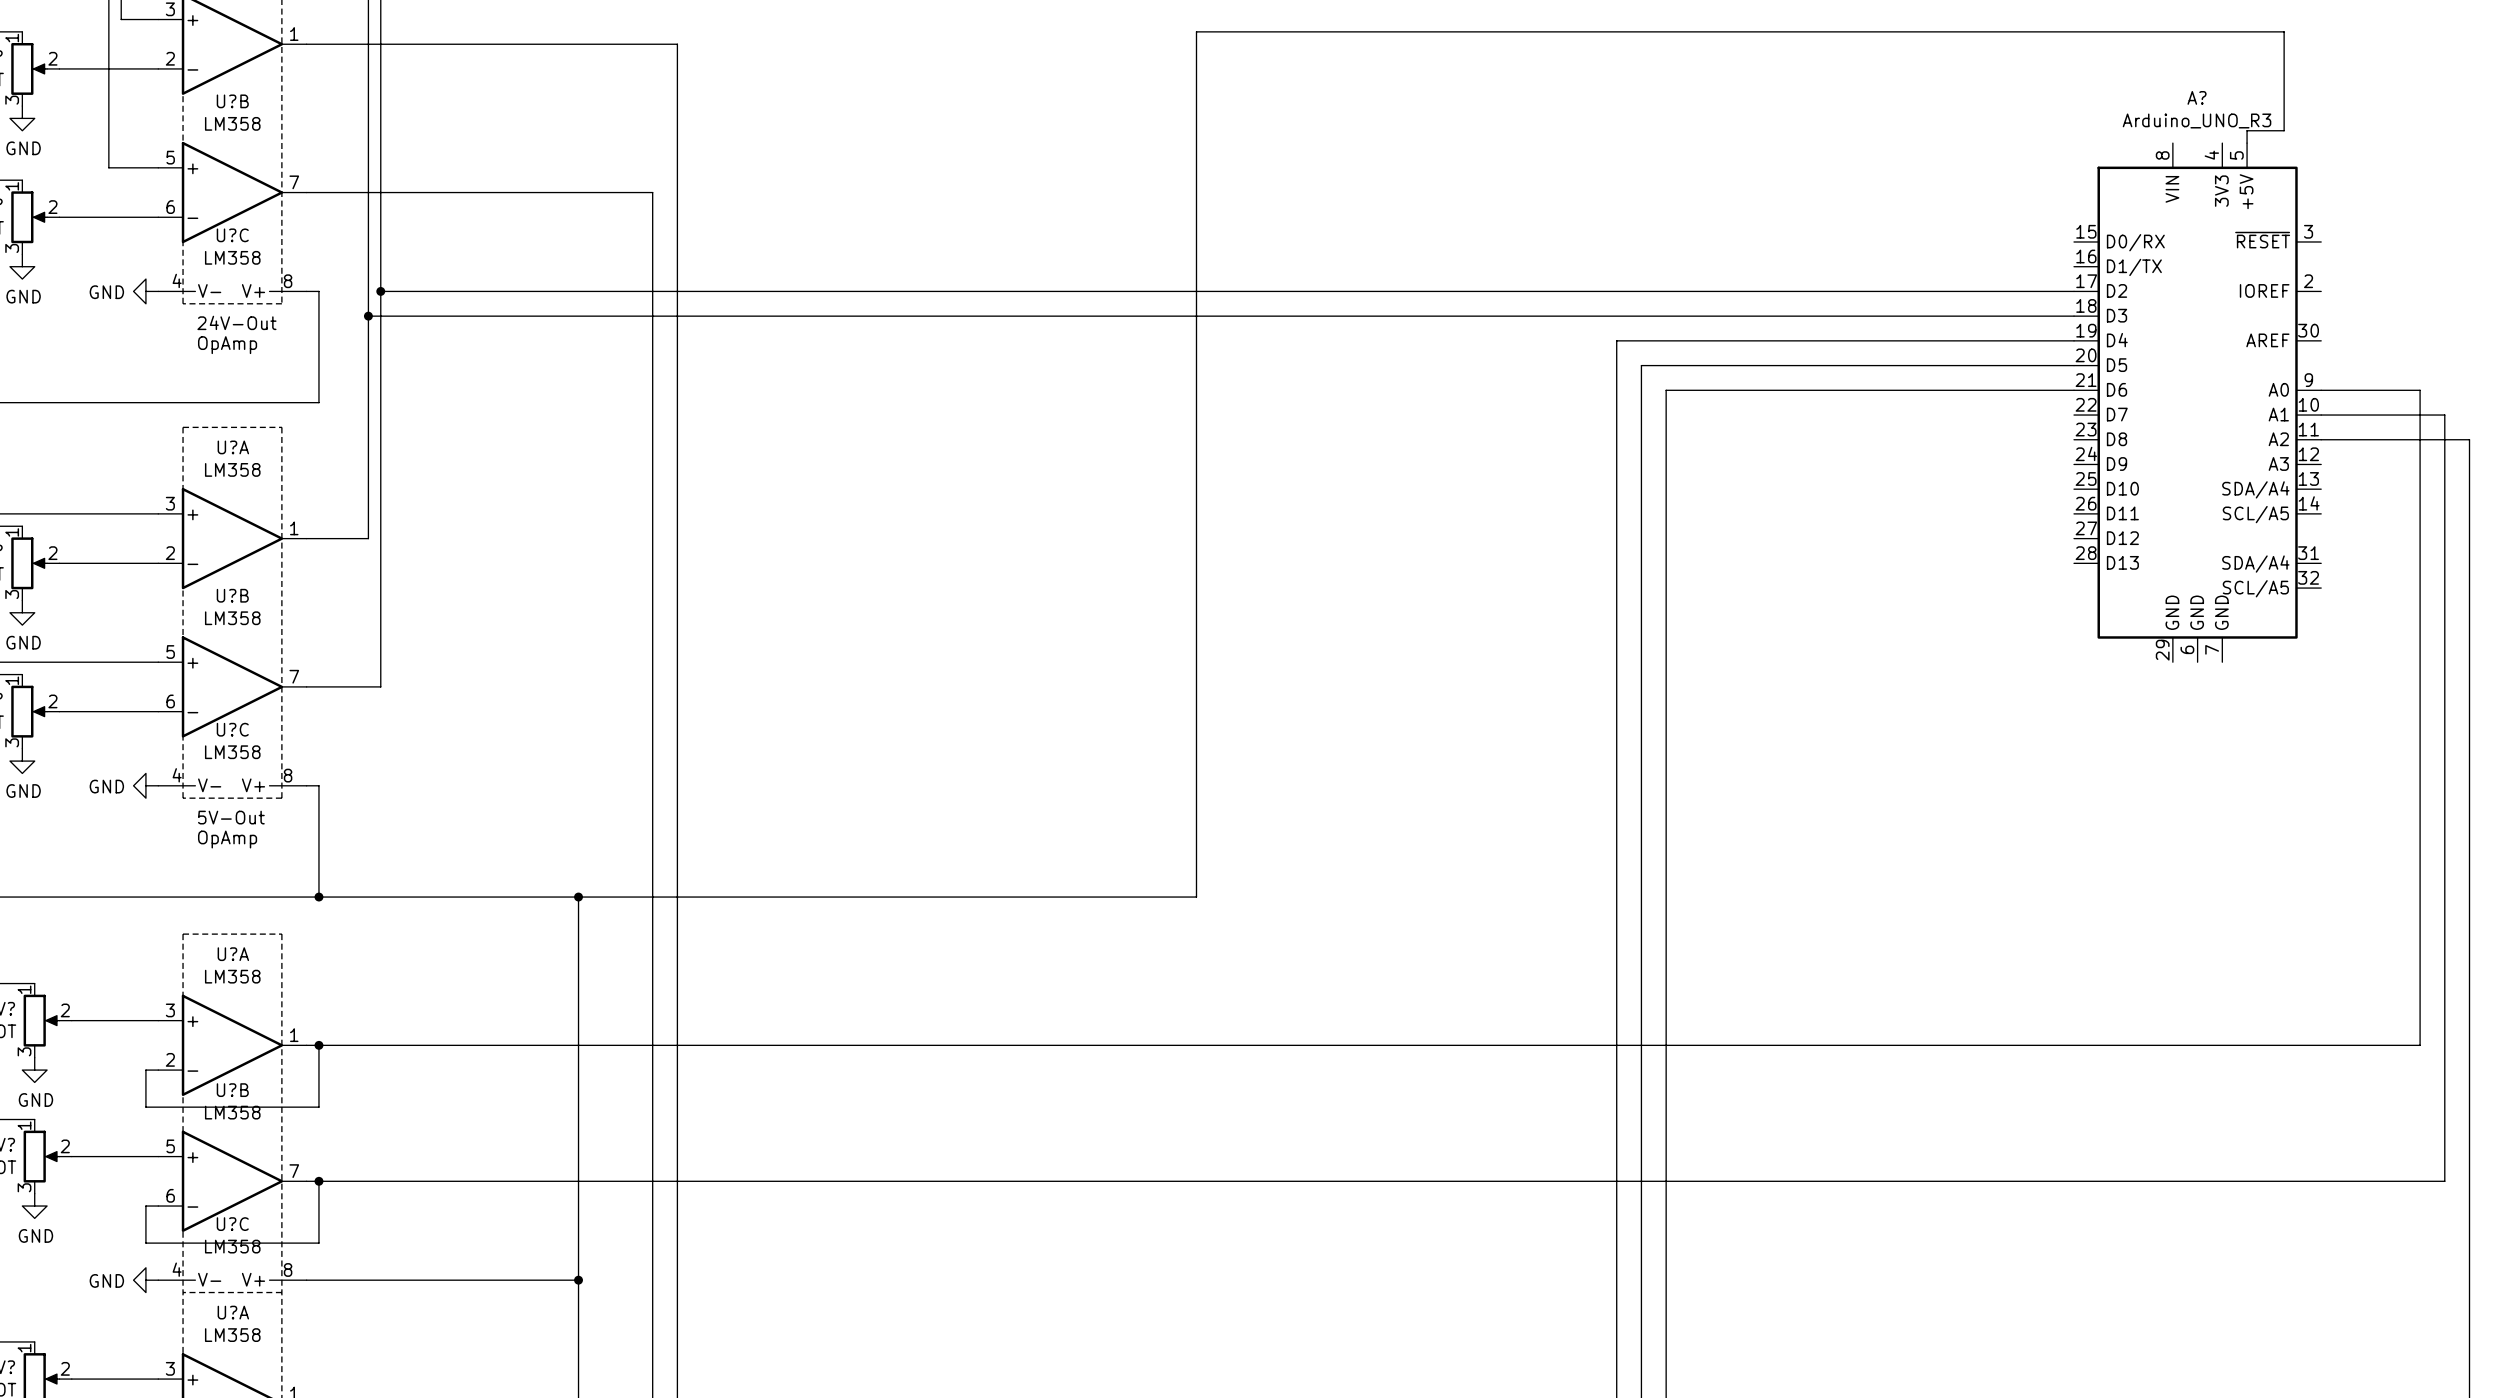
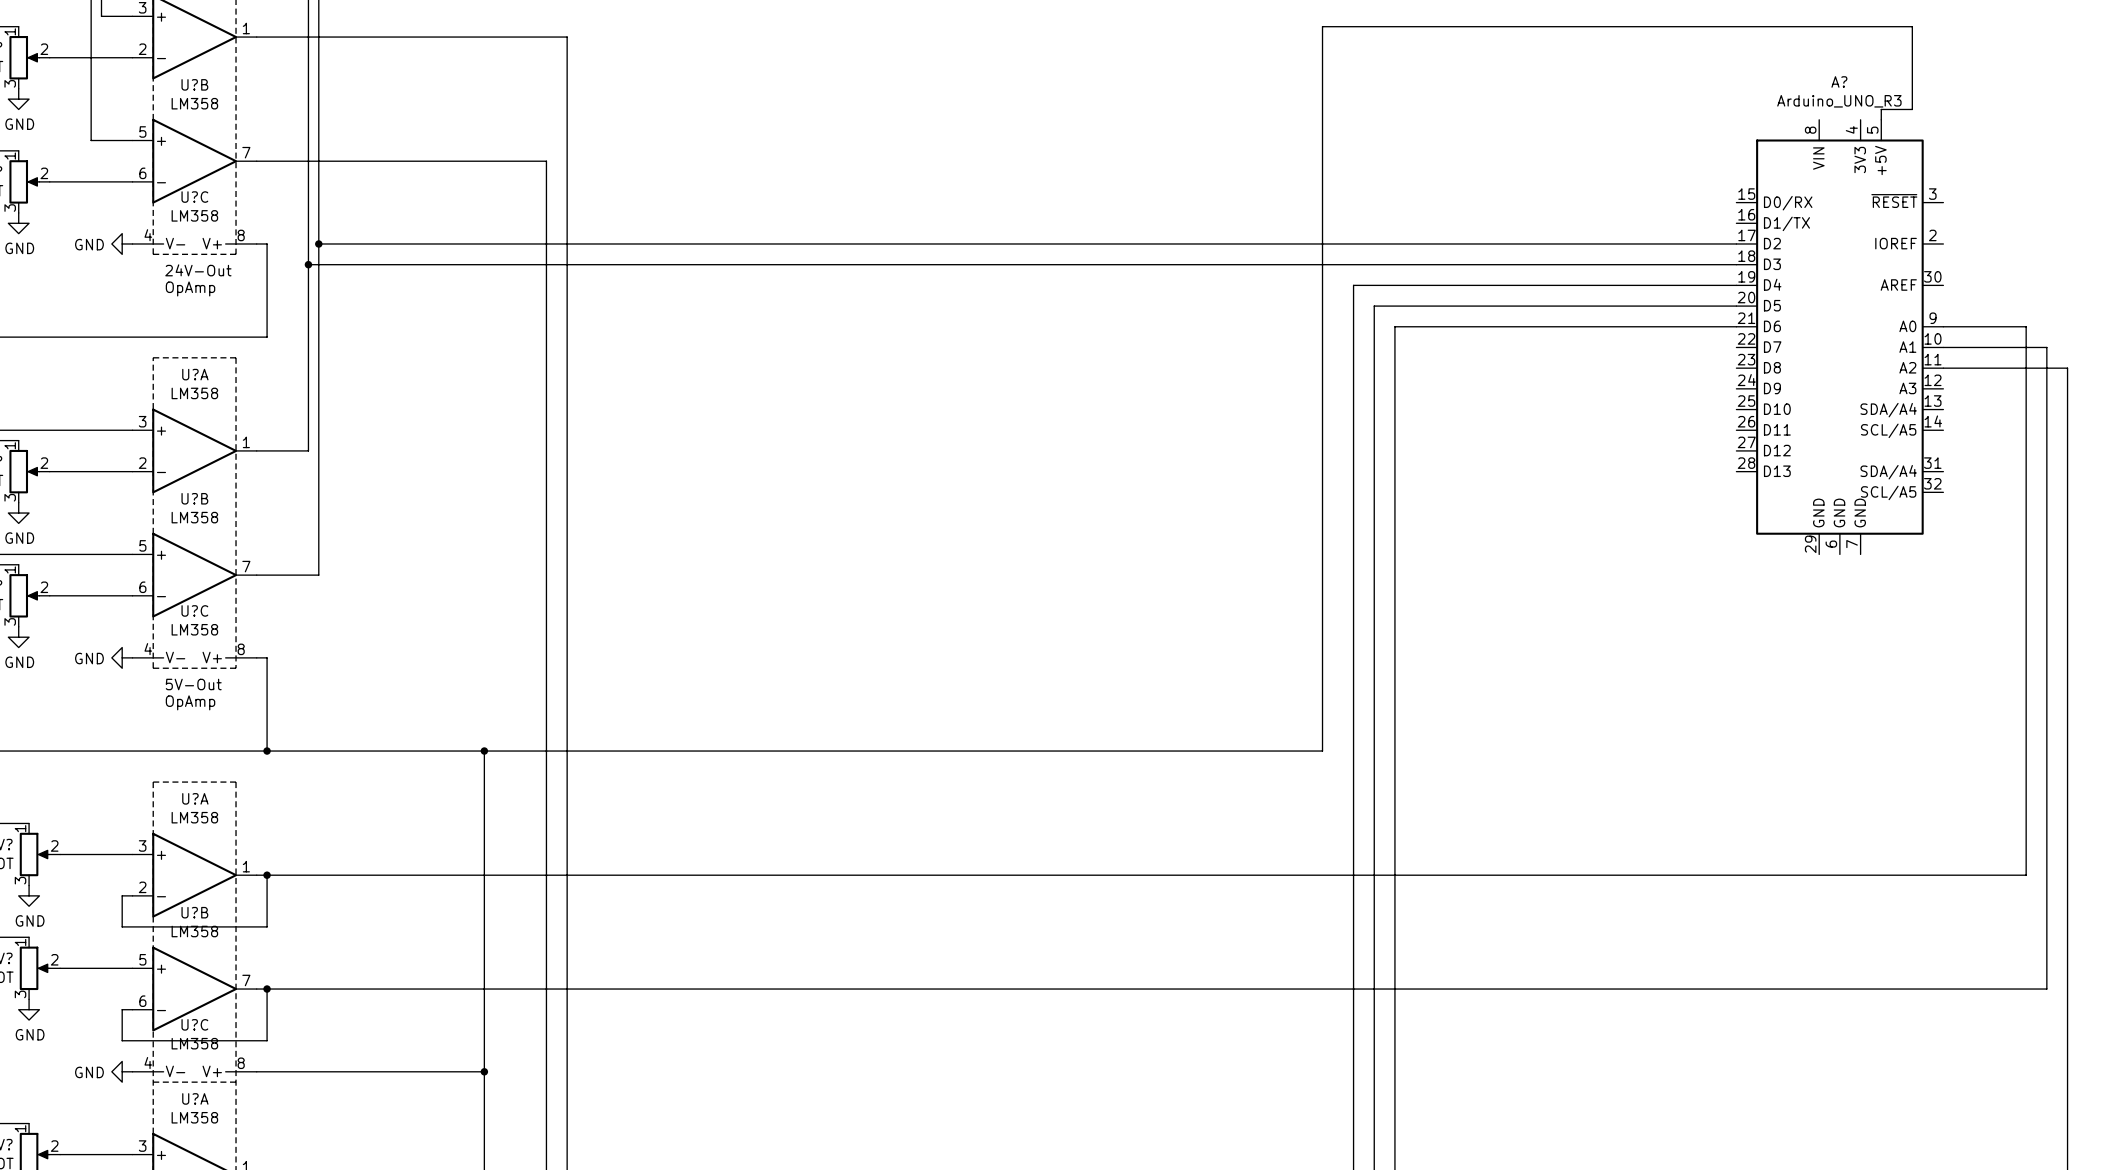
wire: (1579, 31) (1196, 31) (1196, 897) -> (1322, 26) (1322, 751) (1001, 751)

